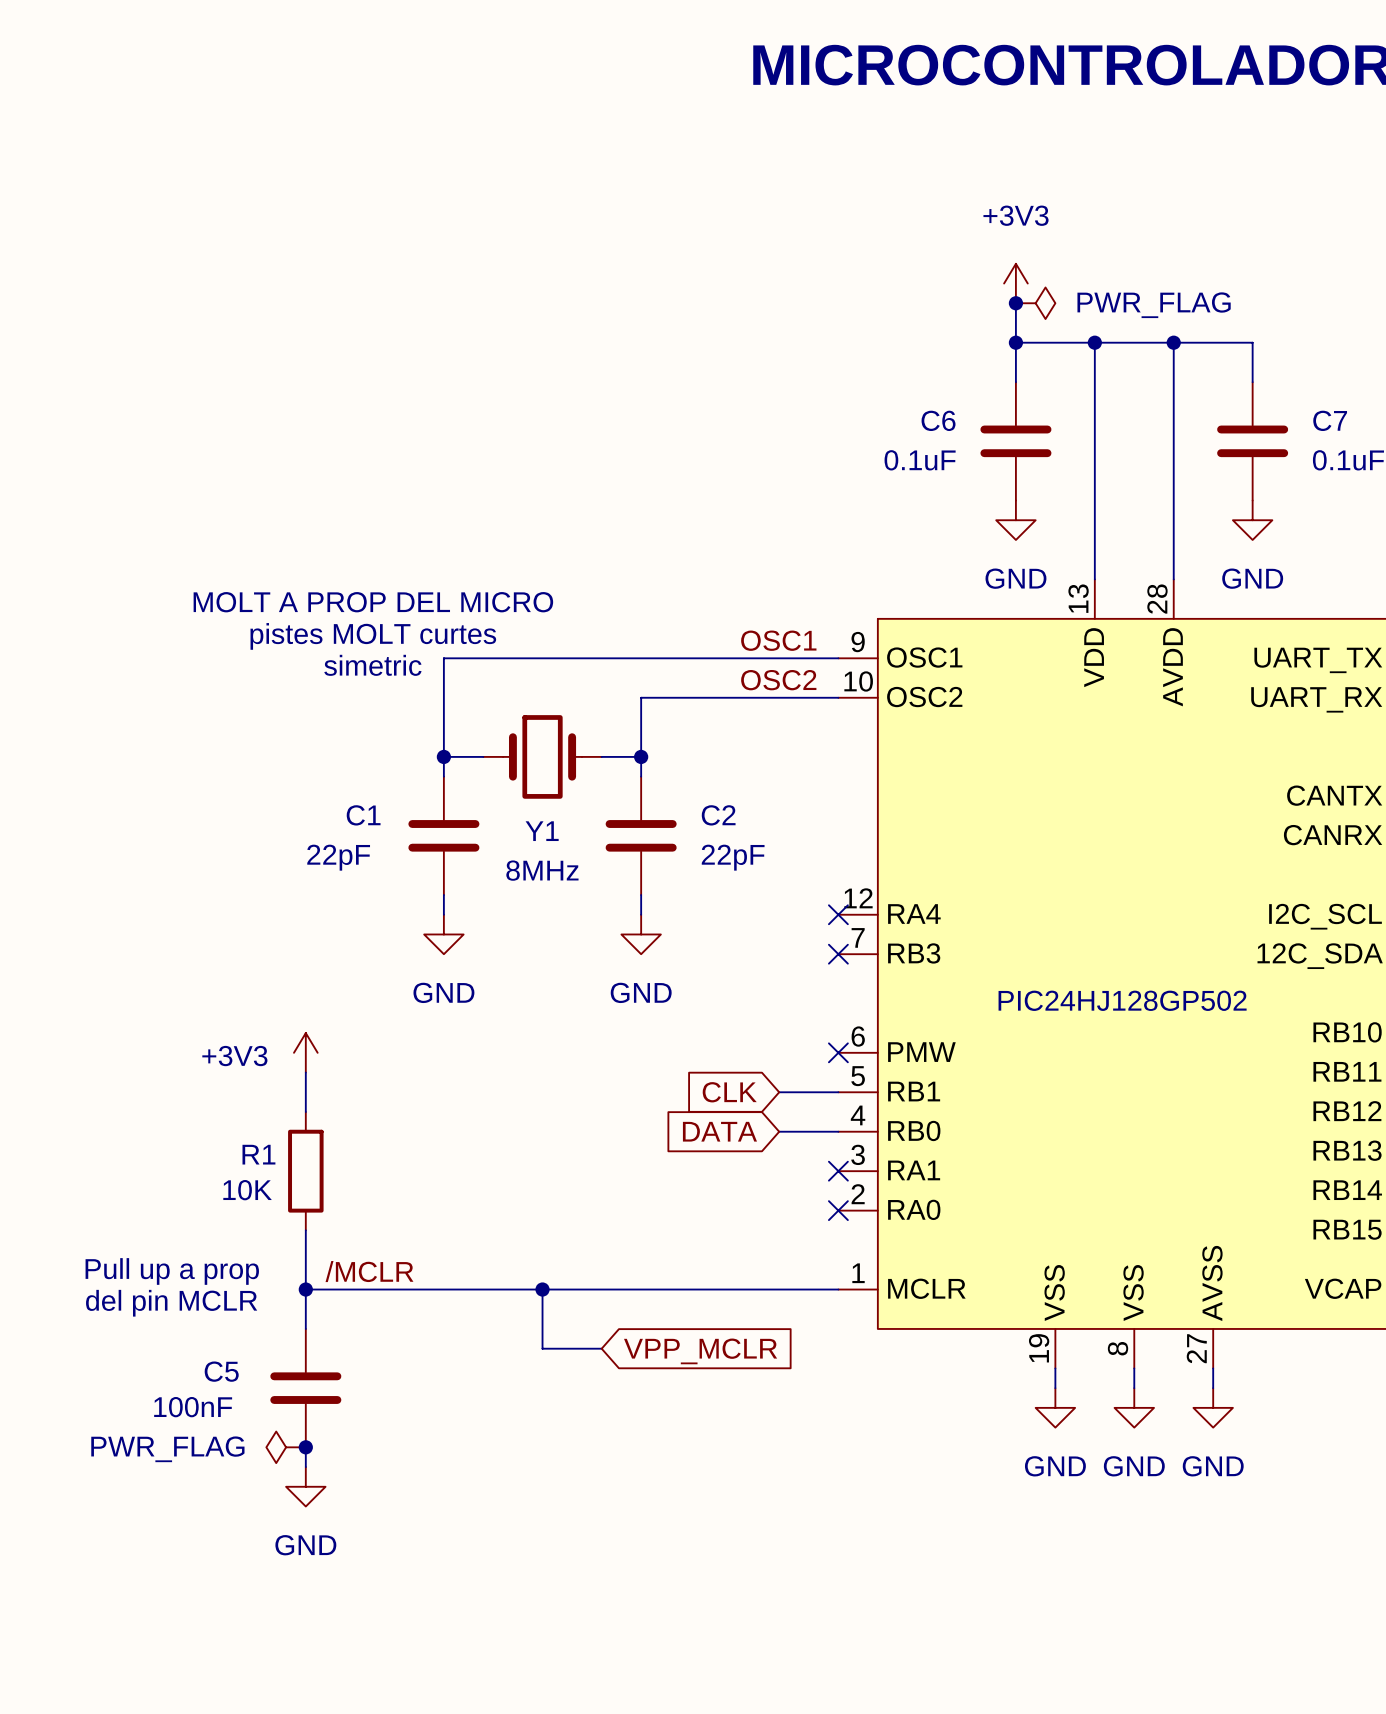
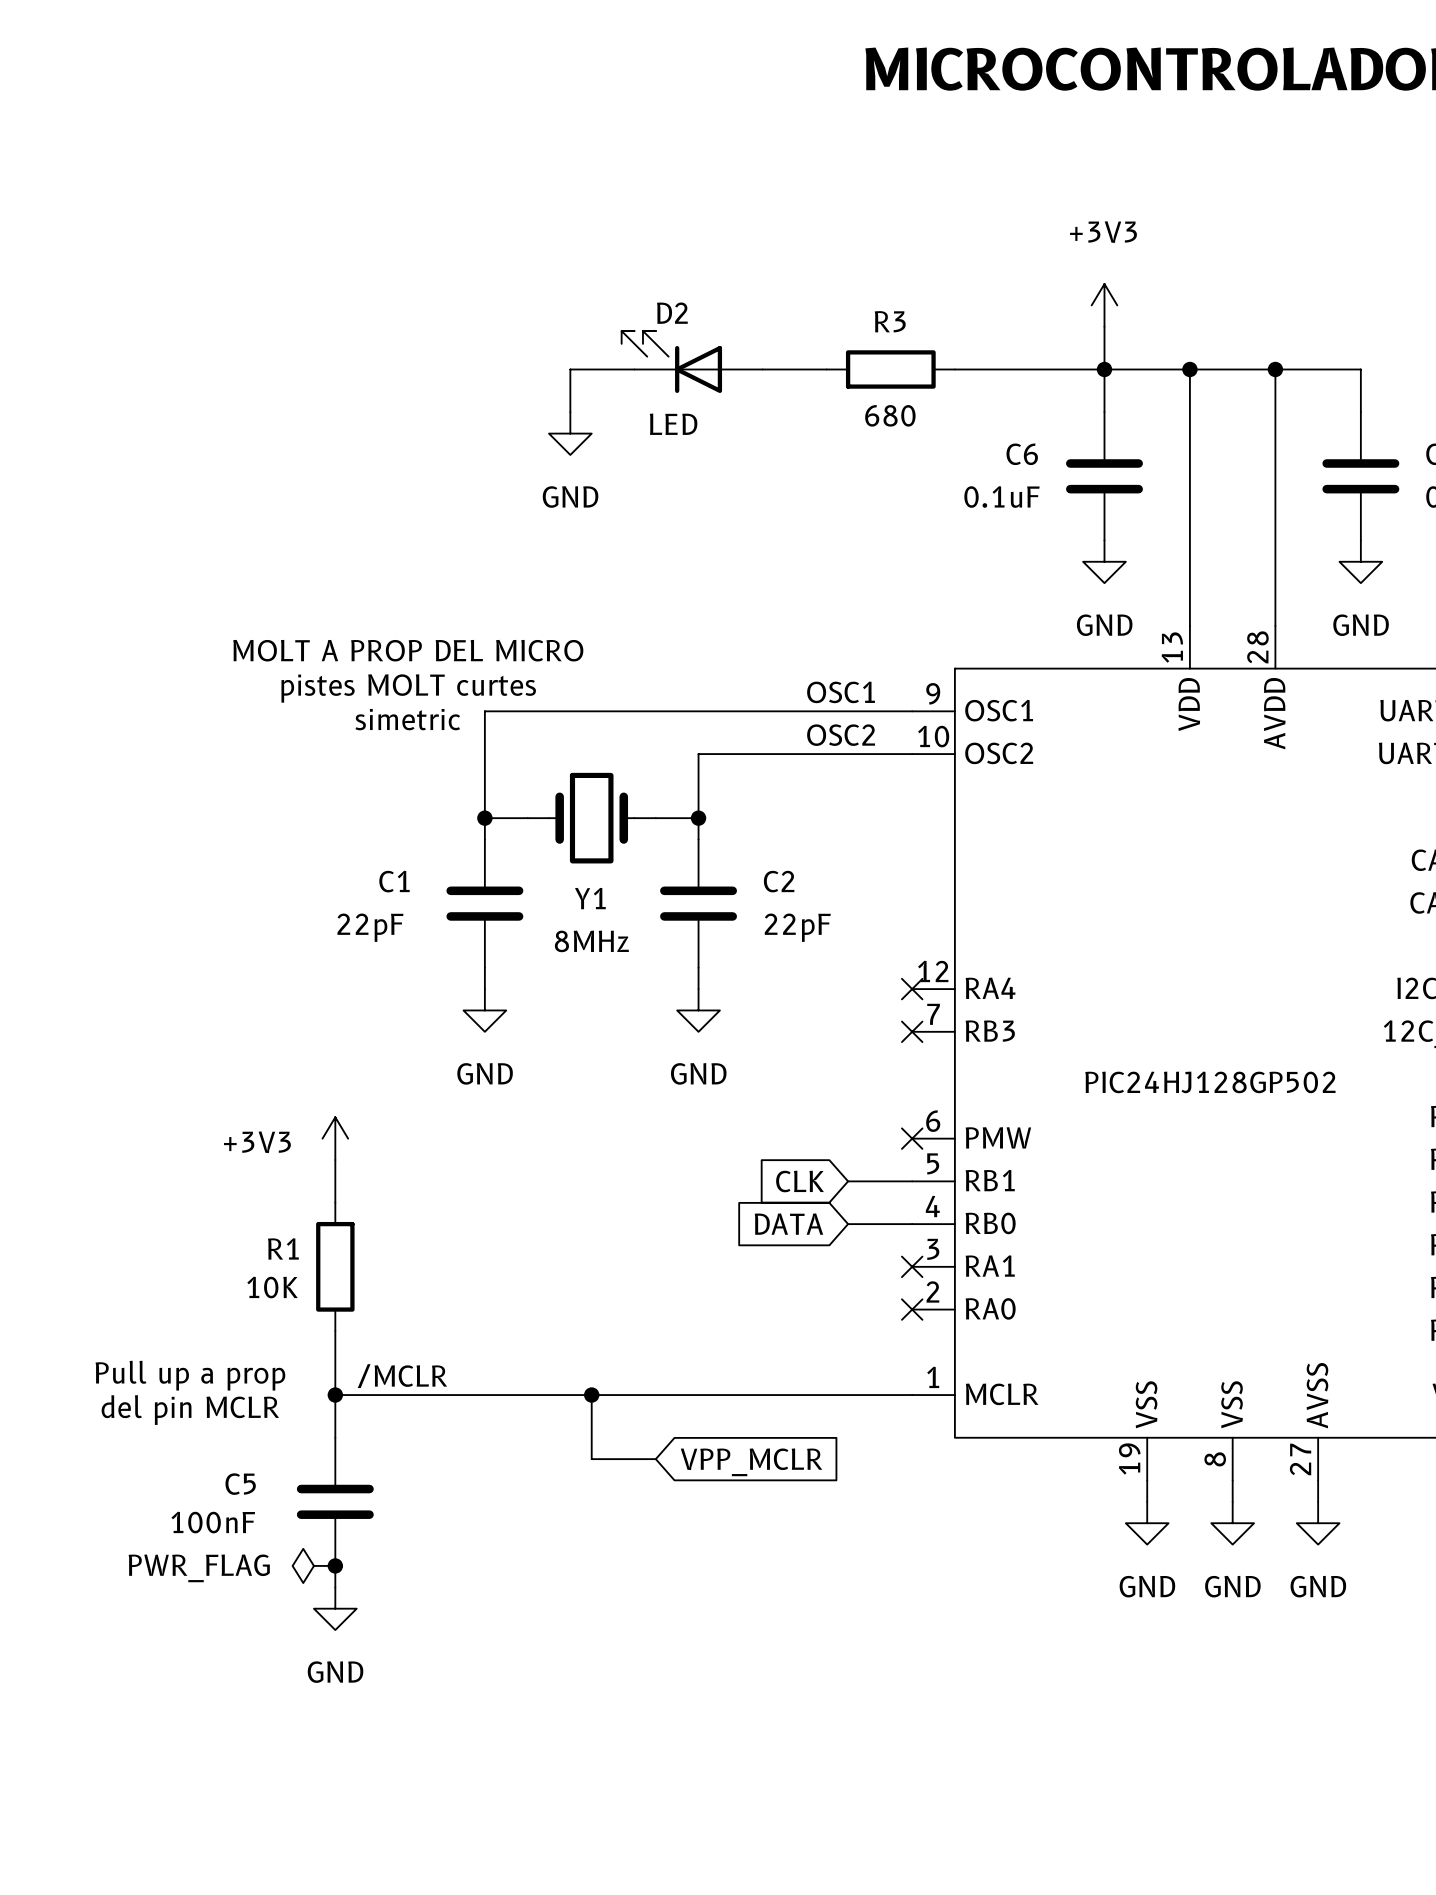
junction: (1015, 303) -> none
power symbol: PWR_FLAG (1035, 303) -> none
D2: none -> LED (692, 362)
wire: none -> (634, 369) (570, 369) (570, 412)
wire: none -> (762, 369) (826, 369)
R3: none -> 680 (890, 369)
wire: none -> (954, 369) (1104, 369)
power symbol: none -> GND (570, 433)

